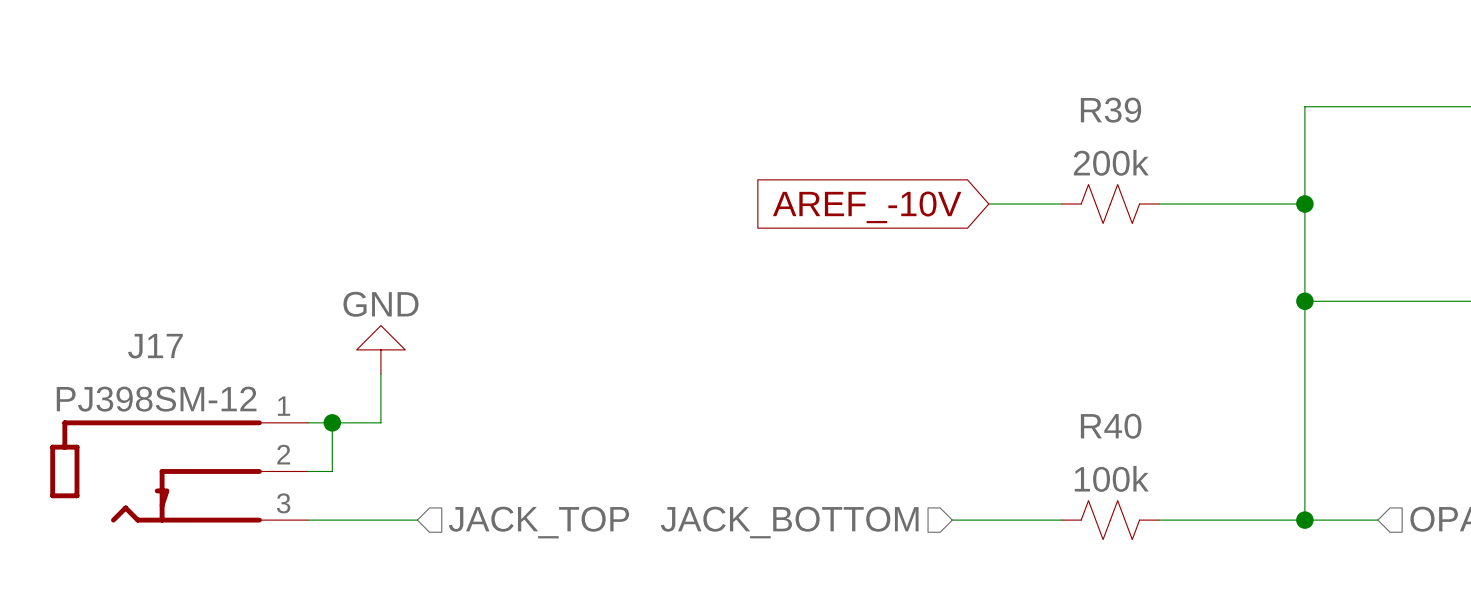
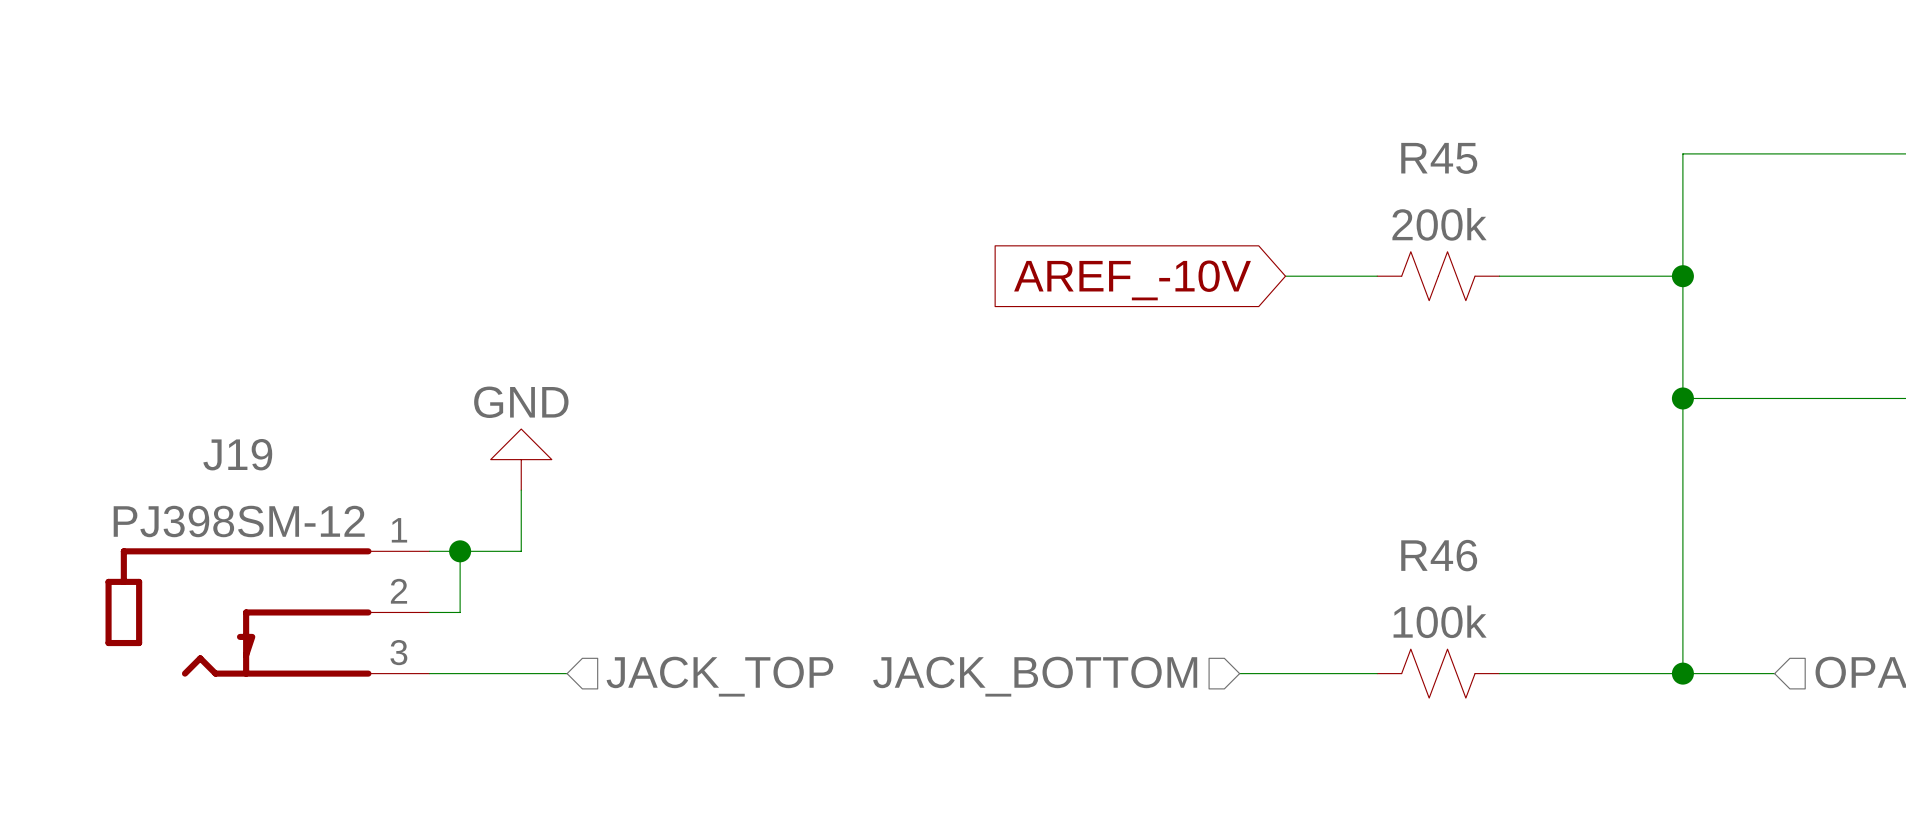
R39 name: R39 (1111, 110) -> R45 (1439, 158)
J17 name: J17 (155, 346) -> J19 (237, 454)
R40 name: R40 (1111, 426) -> R46 (1439, 555)

